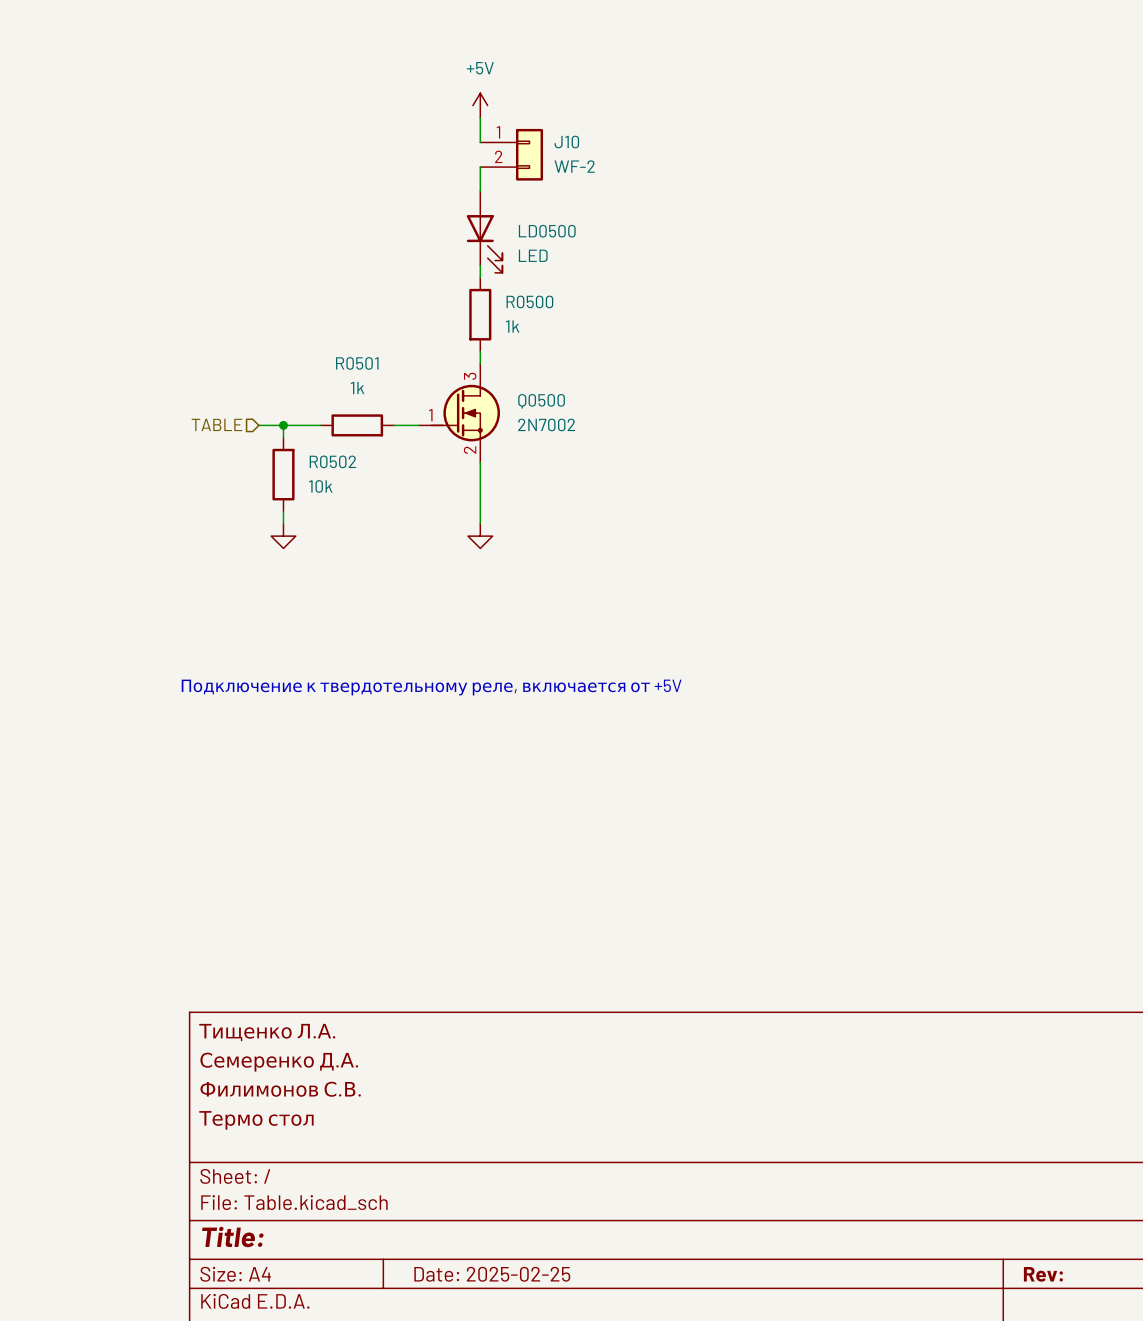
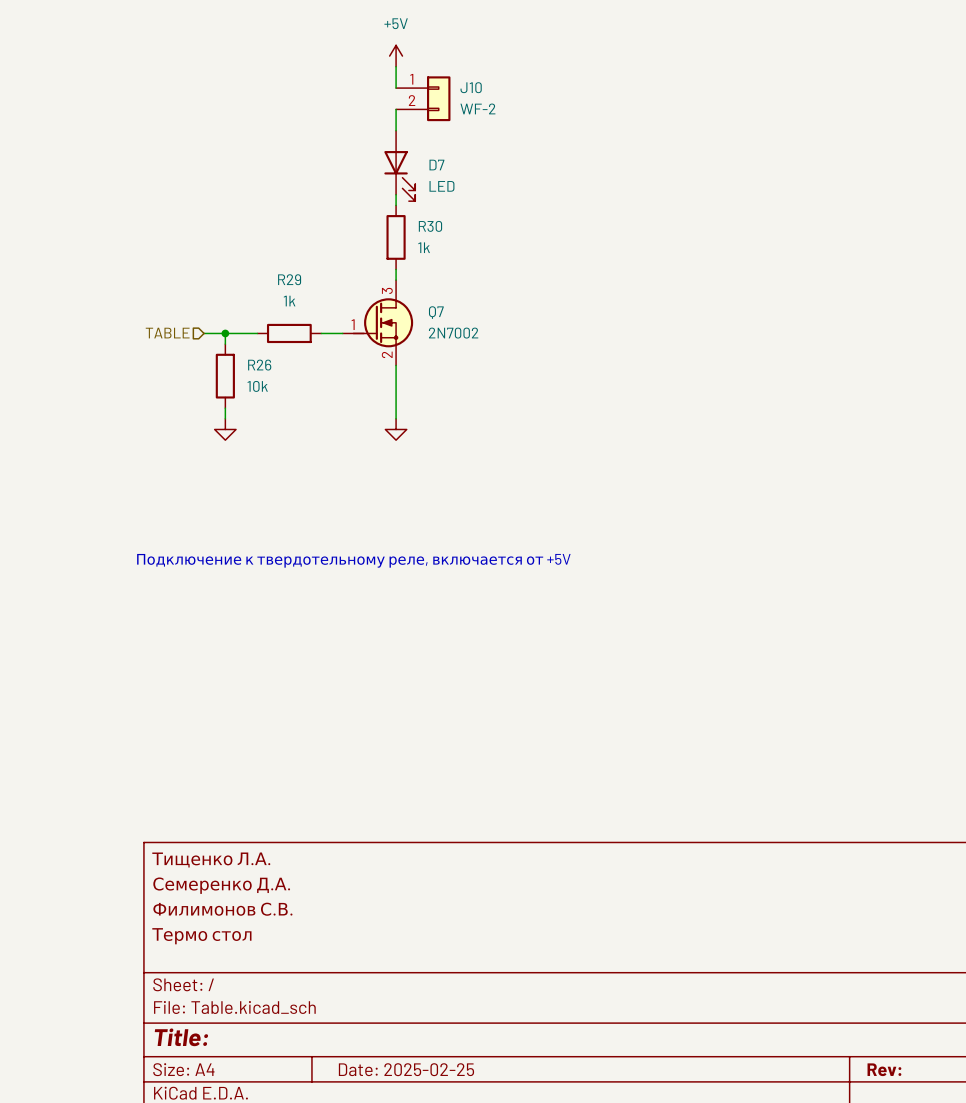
LD0500 name: LD0500 (547, 231) -> D7 (436, 165)
R0500 name: R0500 (529, 301) -> R30 (430, 226)
R0501 name: R0501 (357, 363) -> R29 (289, 279)
Q0500 name: Q0500 (541, 401) -> Q7 (436, 312)
R0502 name: R0502 (332, 461) -> R26 (259, 365)

